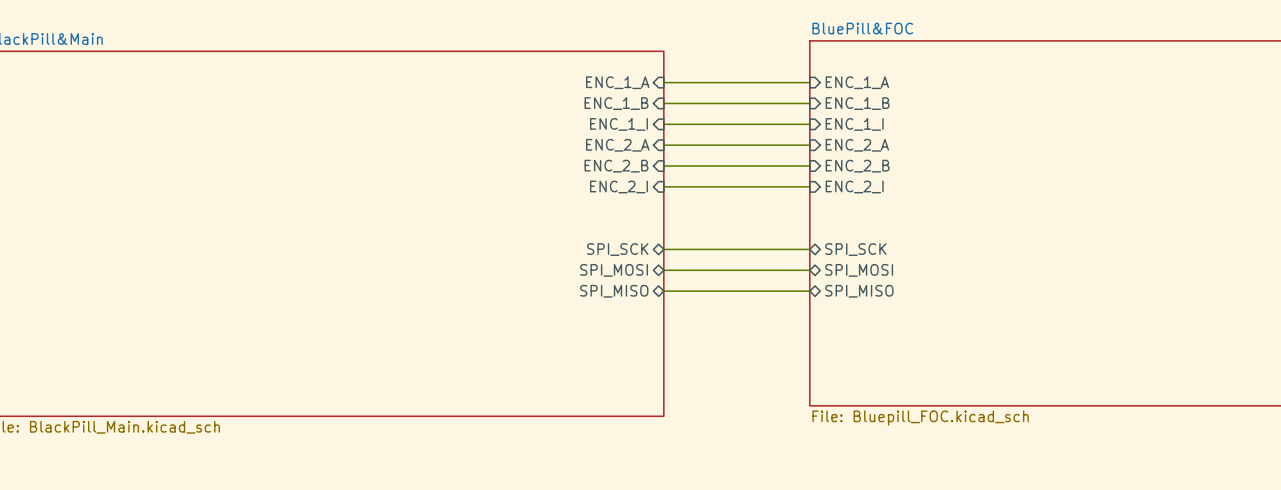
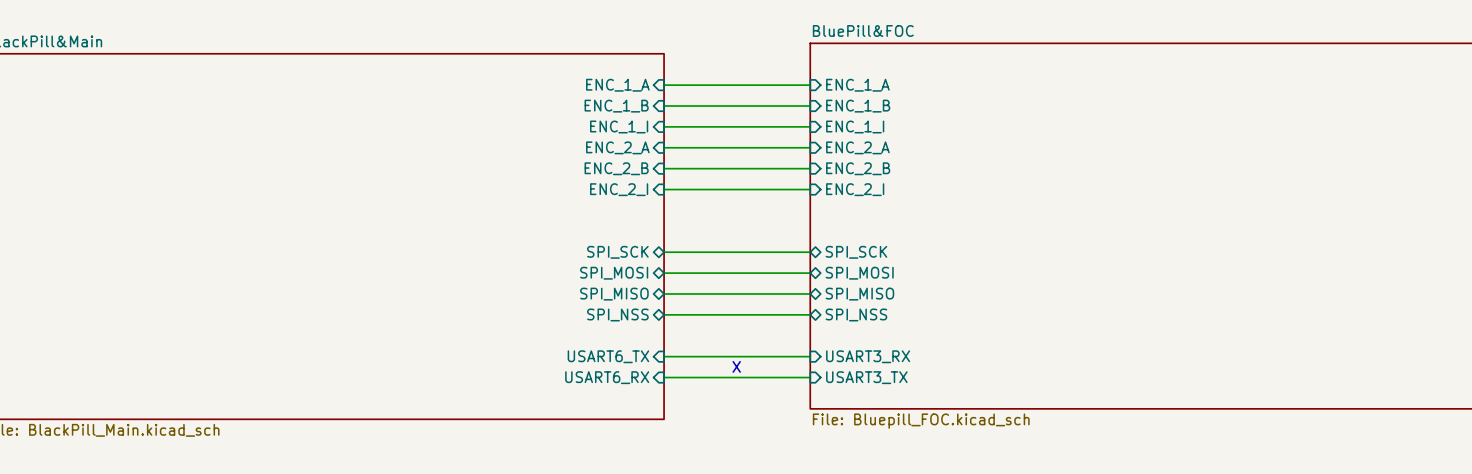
sheet pin: none -> SPI_NSS (617, 314)
wire: none -> (664, 314) (810, 314)
sheet pin: none -> SPI_NSS (856, 314)
sheet pin: none -> USART6_TX (608, 356)
wire: none -> (664, 356) (810, 356)
sheet pin: none -> USART3_RX (868, 356)
text: none -> X (736, 366)
sheet pin: none -> USART6_RX (607, 377)
wire: none -> (664, 377) (810, 377)
sheet pin: none -> USART3_TX (866, 377)

